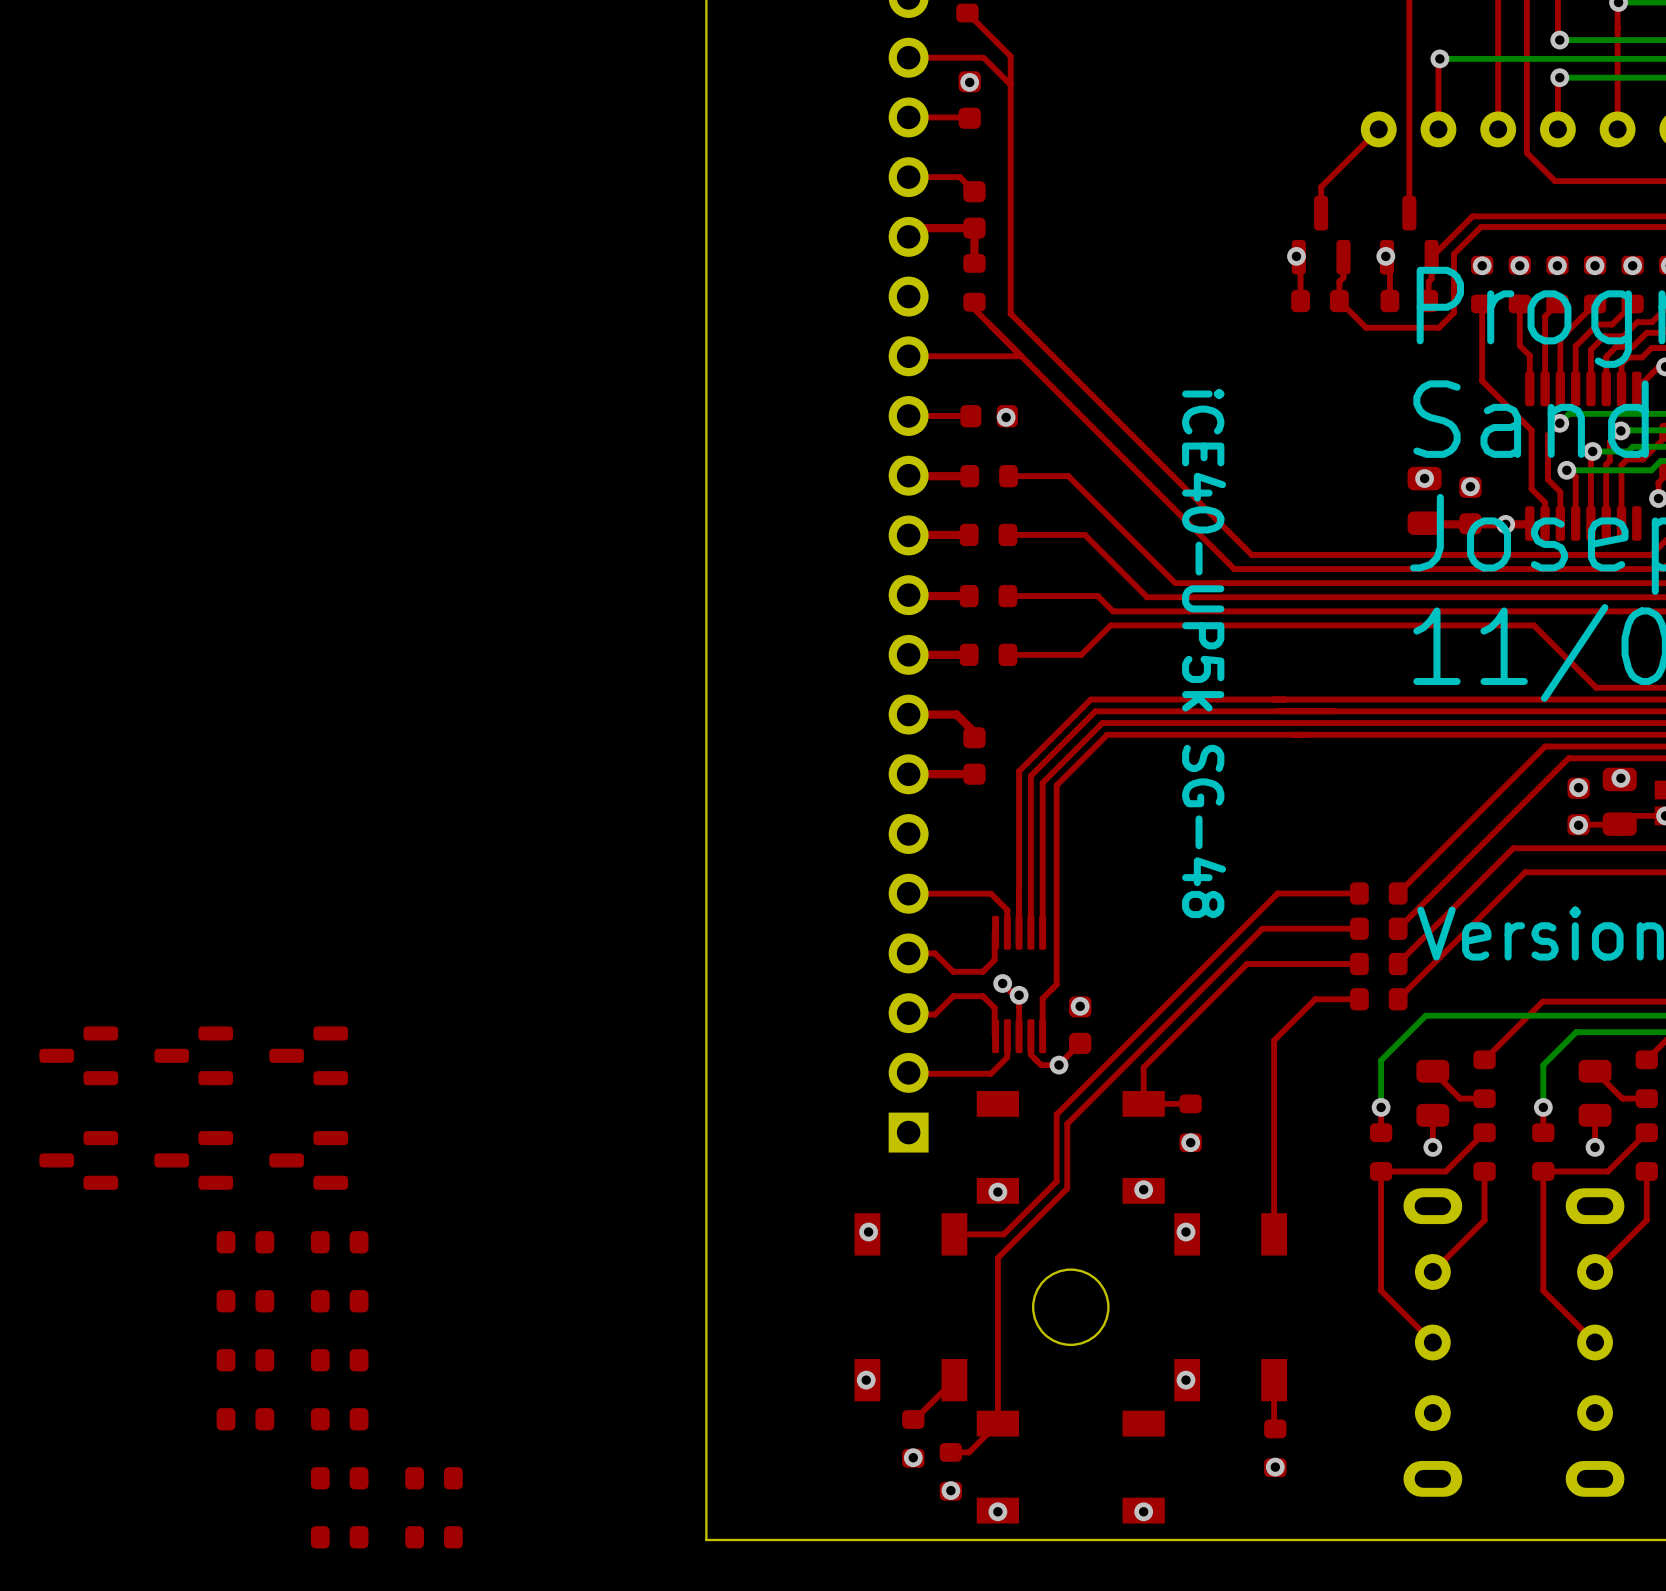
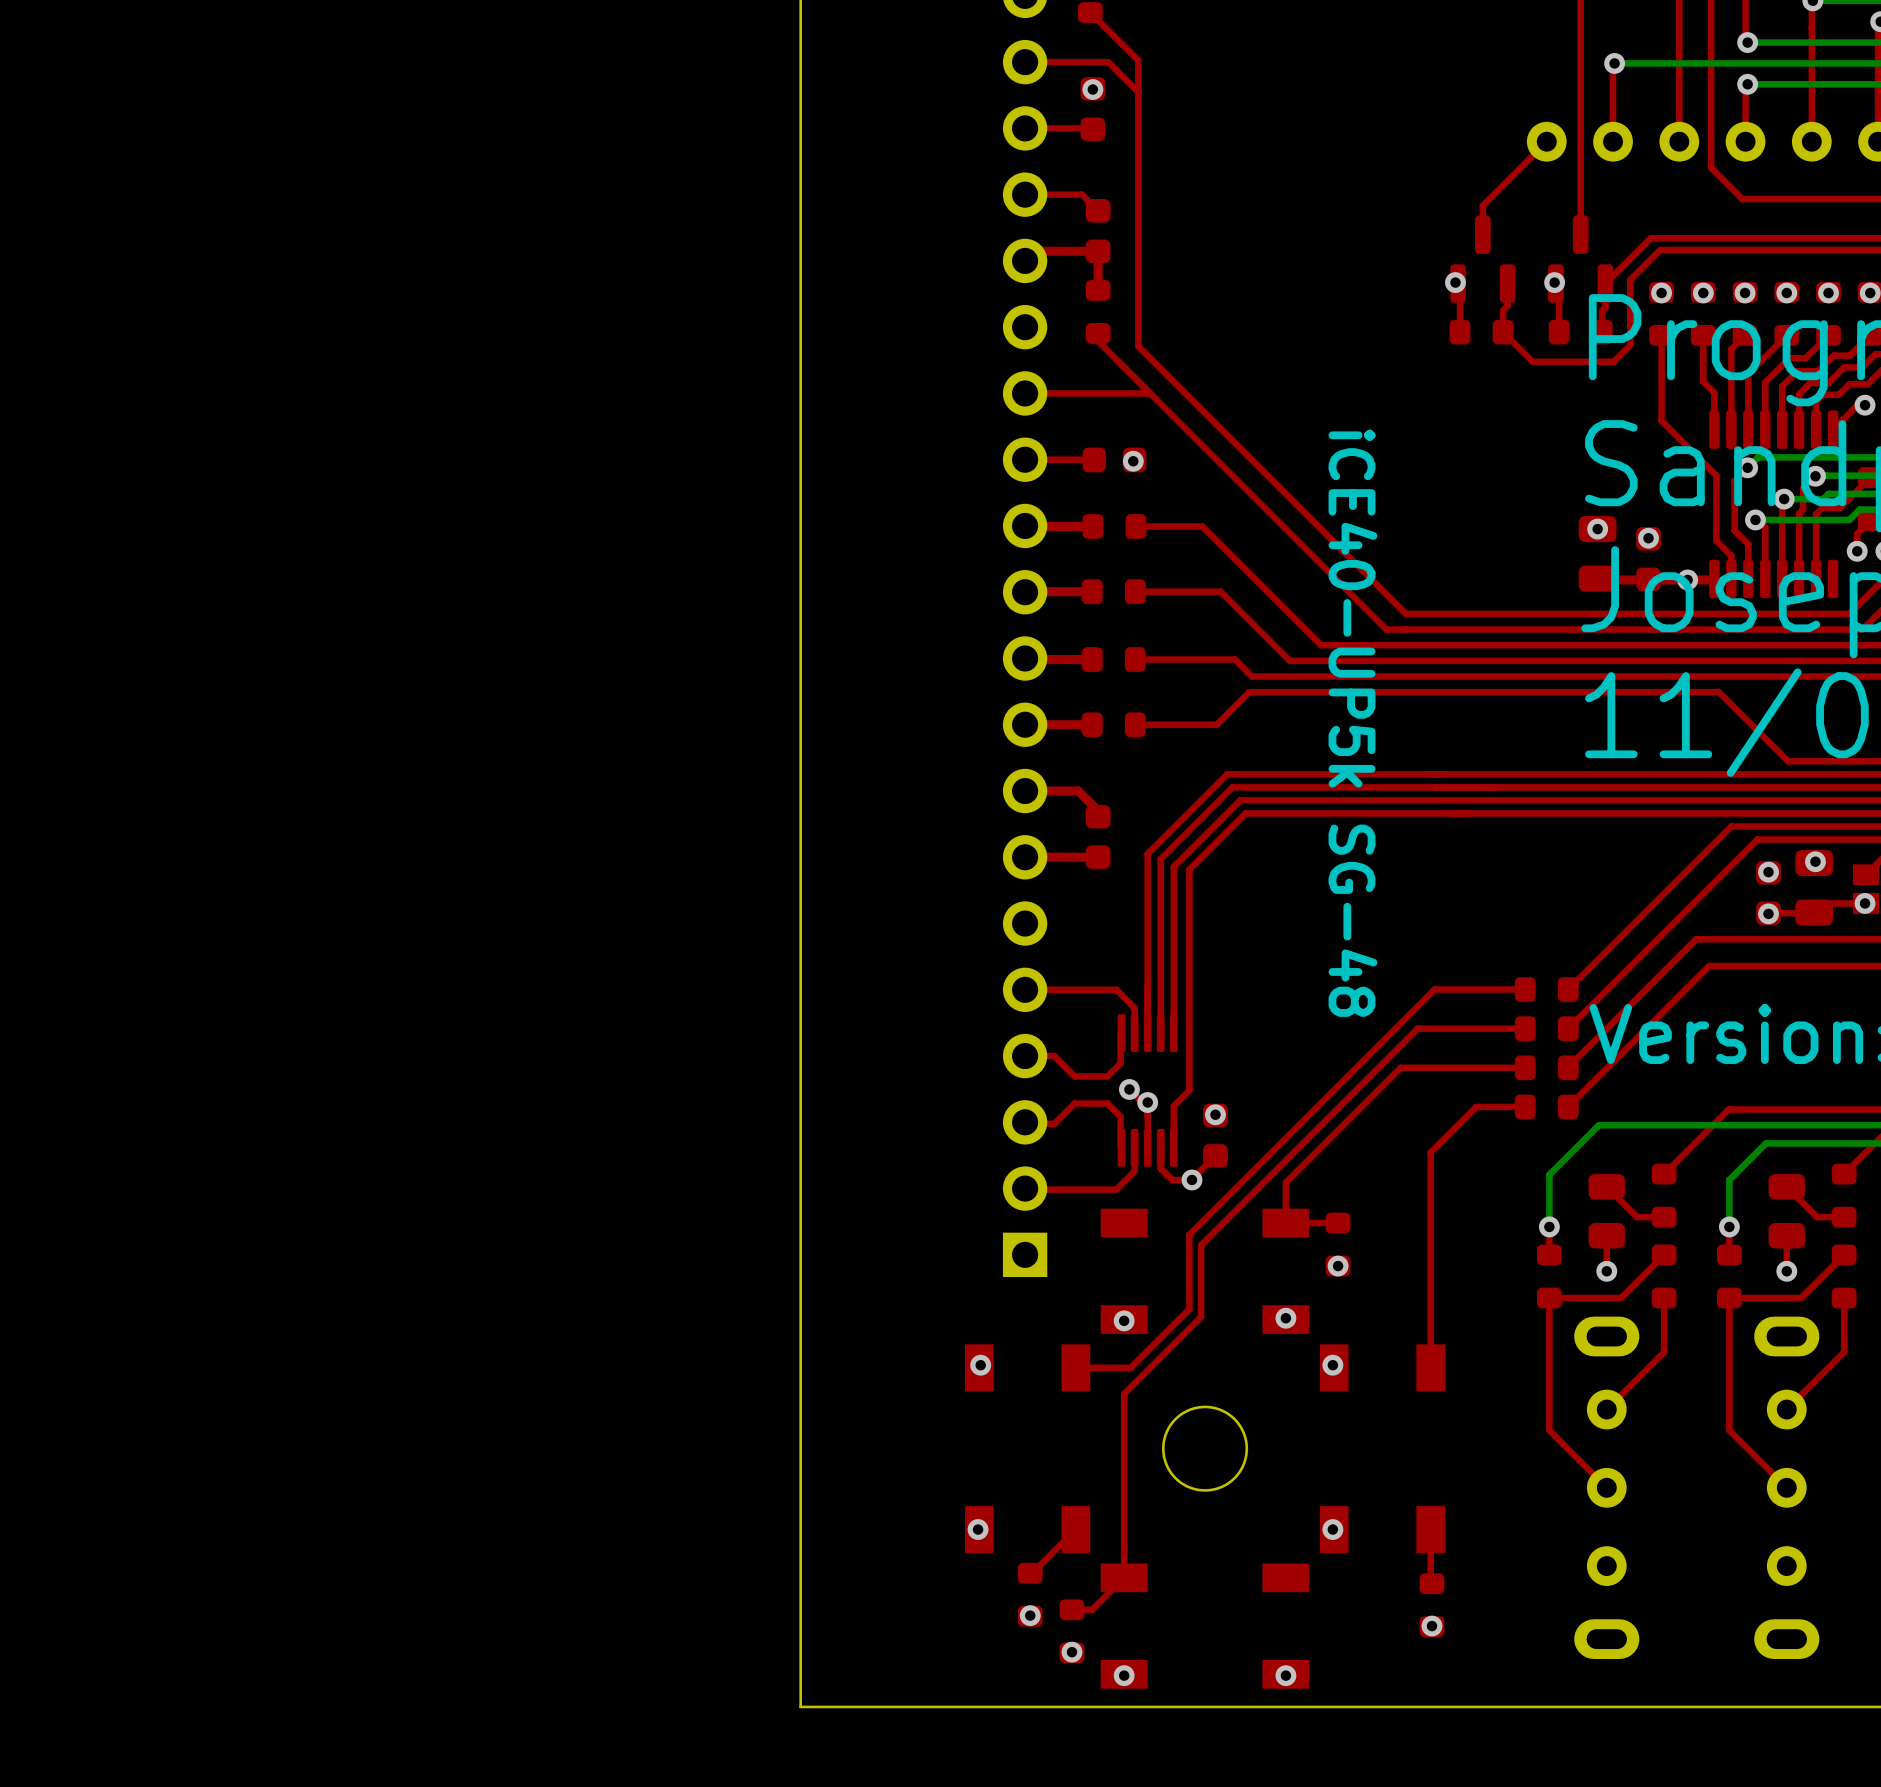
part: (78, 1055) -> none
part: (193, 1055) -> none
part: (308, 1055) -> none
part: (78, 1160) -> none
part: (193, 1160) -> none
part: (308, 1160) -> none
part: (245, 1242) -> none
part: (339, 1242) -> none
part: (245, 1301) -> none
part: (339, 1301) -> none
part: (245, 1360) -> none
part: (339, 1360) -> none
part: (245, 1419) -> none
part: (339, 1419) -> none
part: (339, 1478) -> none
part: (433, 1478) -> none
part: (339, 1537) -> none
part: (433, 1537) -> none

